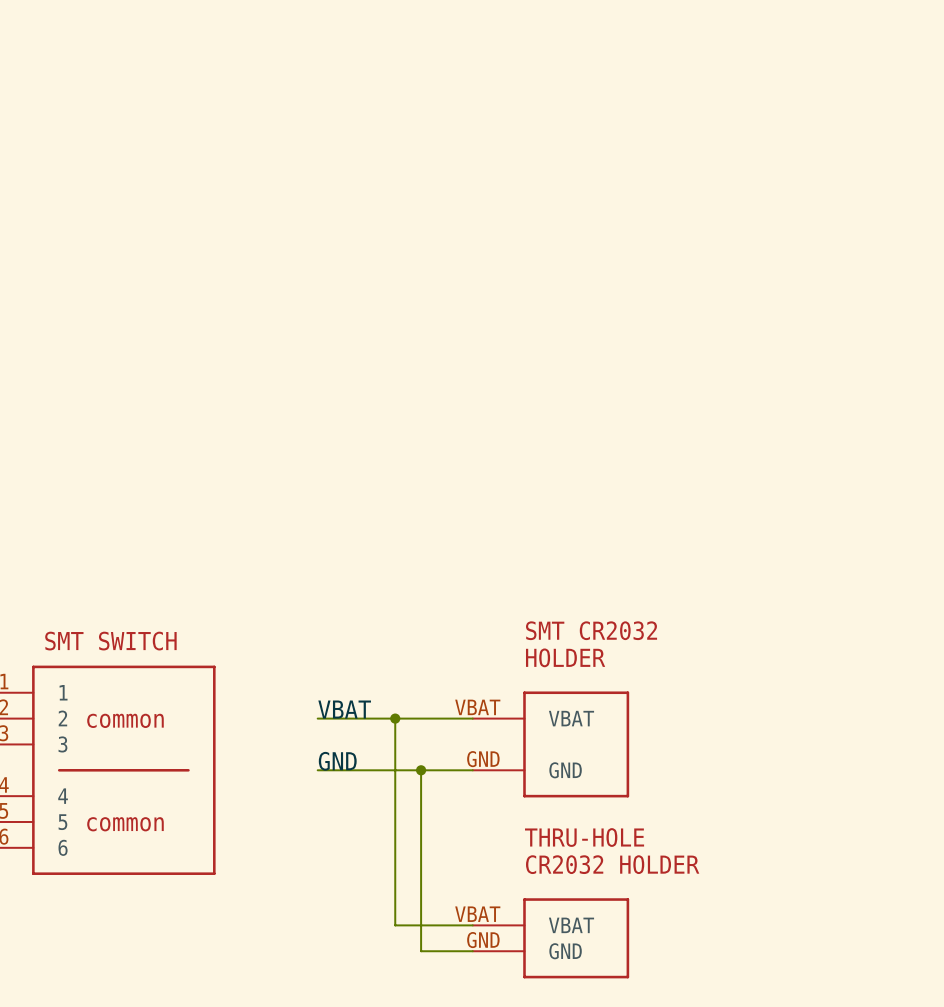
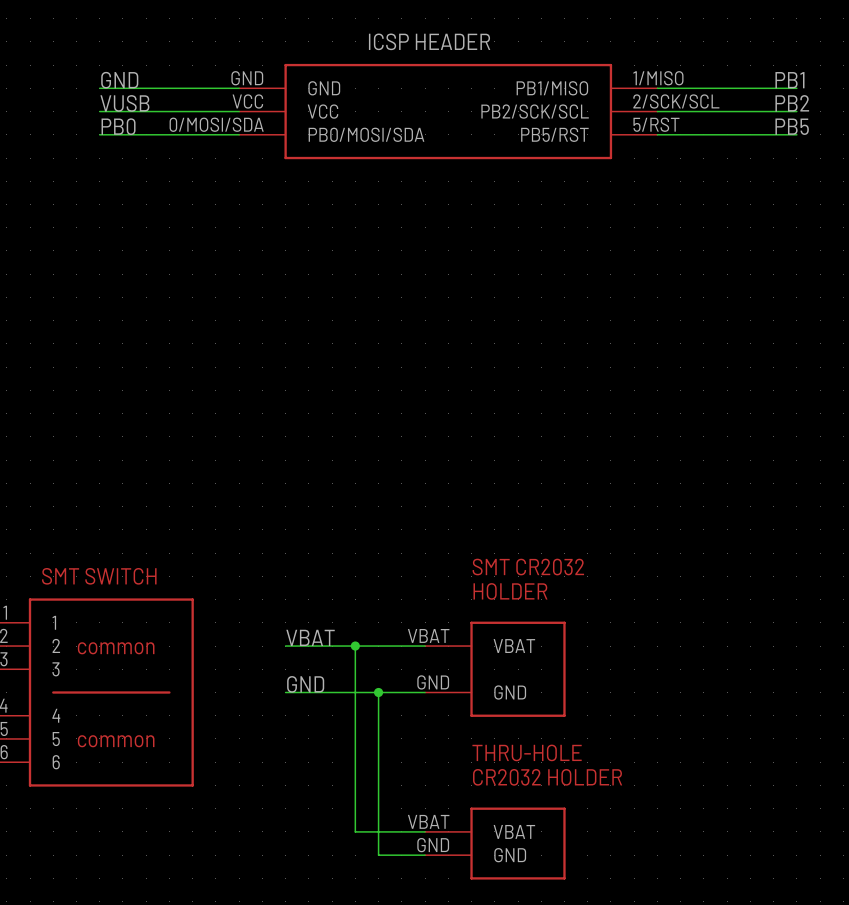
label: none -> GND (119, 80)
label: none -> PB1 (789, 80)
wire: none -> (99, 88) (239, 88)
wire: none -> (657, 88) (796, 88)
label: none -> PB2 (792, 103)
label: none -> VUSB (124, 103)
wire: none -> (99, 111) (239, 111)
part: none -> (448, 111)
wire: none -> (657, 111) (796, 111)
label: none -> PB0 (118, 126)
label: none -> PB5 (792, 126)
wire: none -> (99, 134) (239, 134)
wire: none -> (657, 134) (796, 134)

